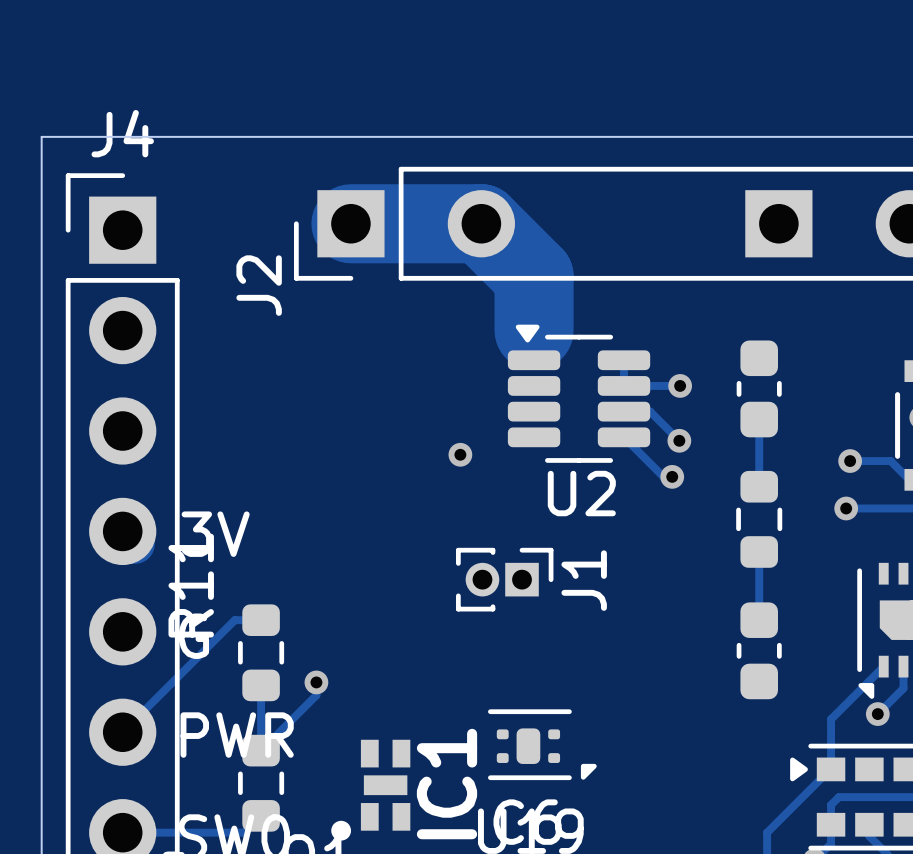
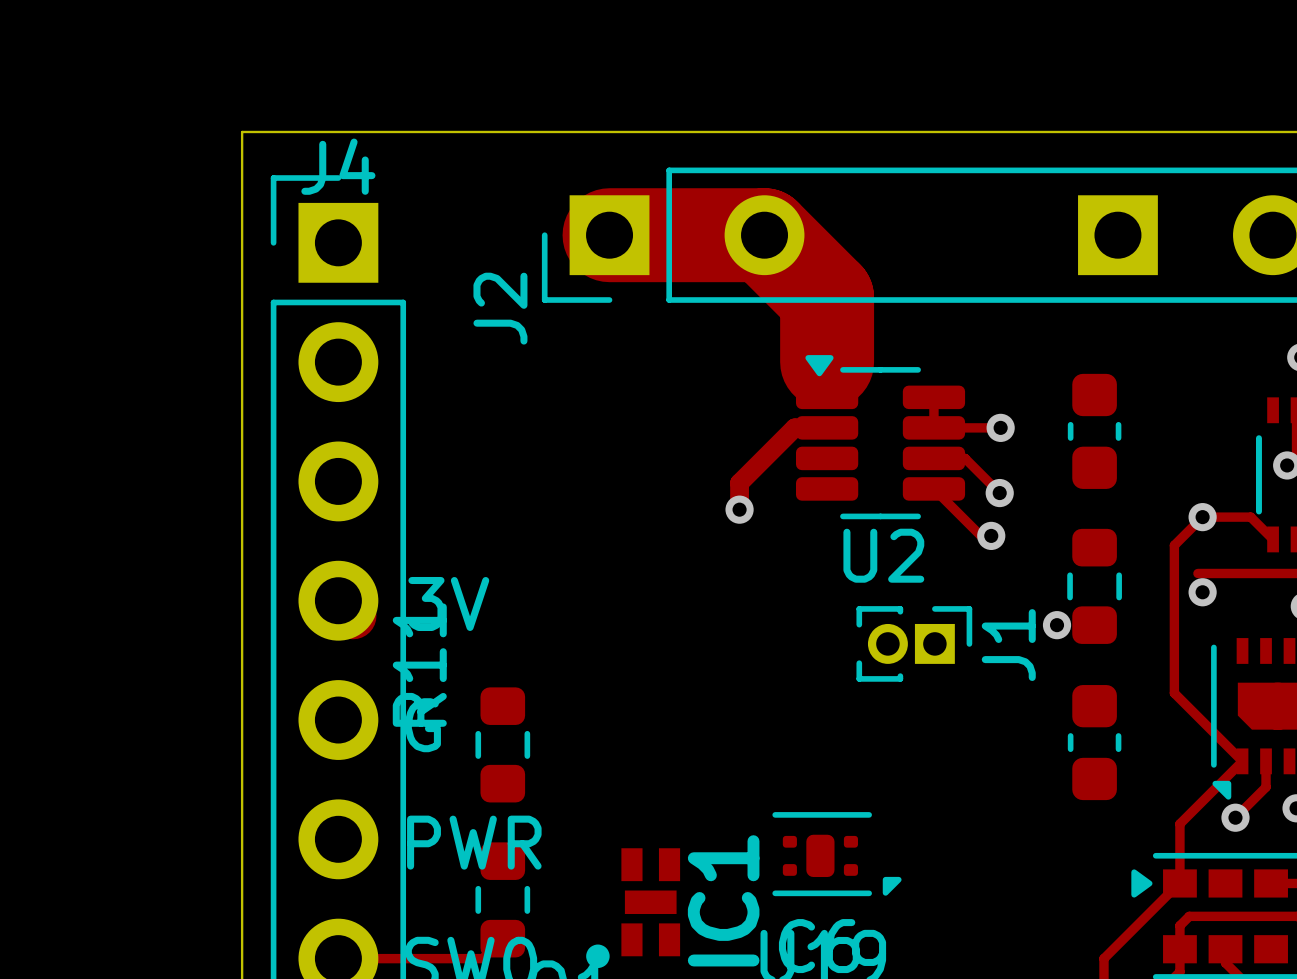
J4 name position: J4 (122, 133) -> J4 (338, 166)
track: none -> (827, 427) (794, 427) (739, 483) (739, 509)
track: (759, 419) (759, 486) -> none
track: none -> (1202, 517) (1174, 545) (1174, 693) (1242, 761)
via position: (846, 508) -> (1202, 592)
via: none -> (1057, 625)
track: (759, 551) (759, 620) -> none
J1 position: (504, 579) -> (914, 643)
track: (261, 620) (234, 620) (122, 732) -> none
track: (316, 682) (316, 695) (261, 750) (261, 685) -> none
via: (316, 682) -> none

